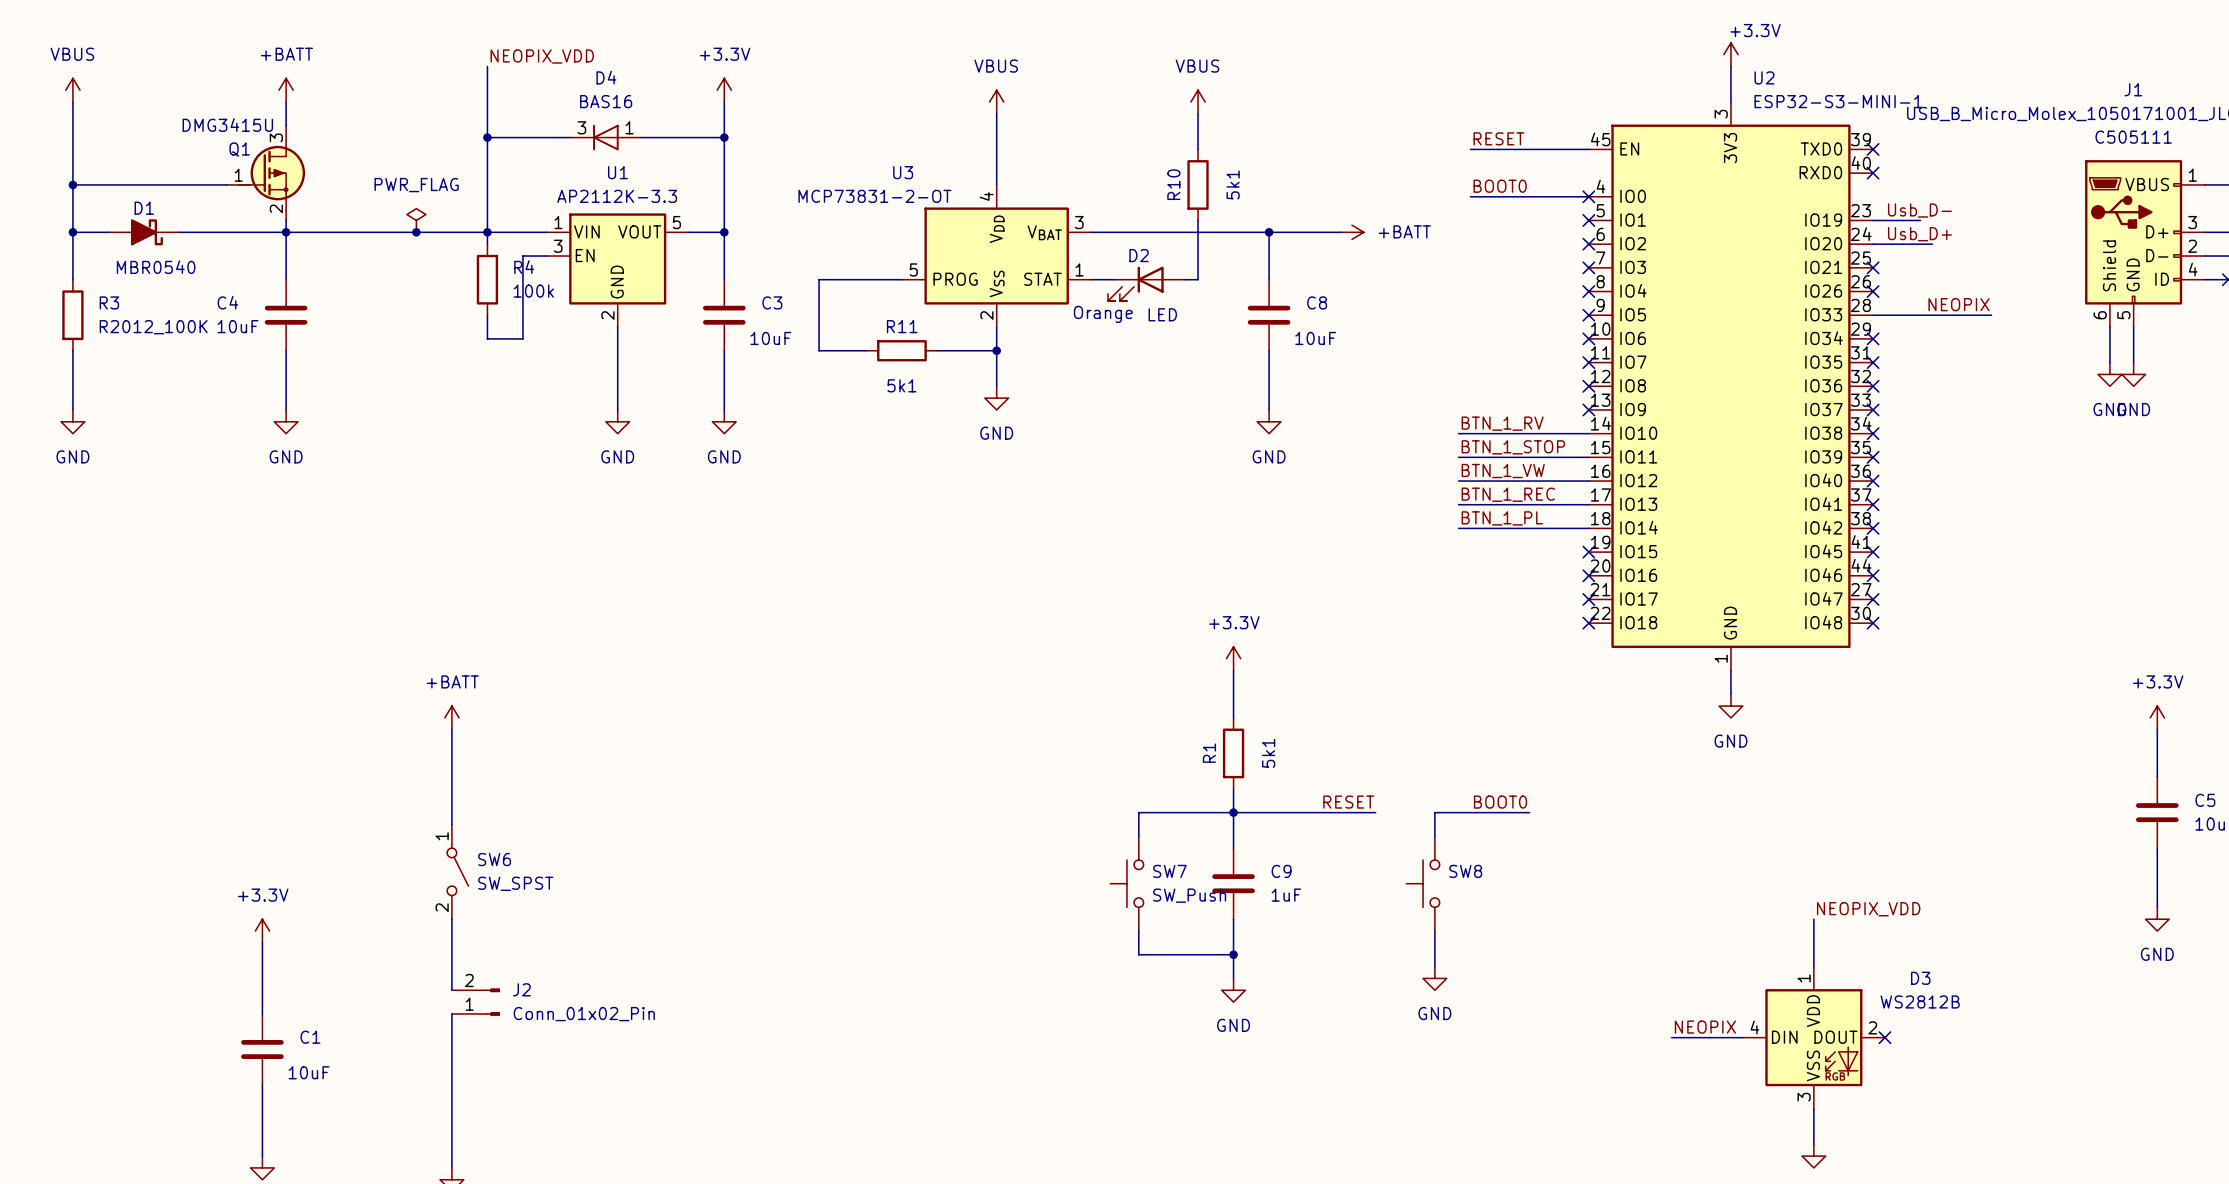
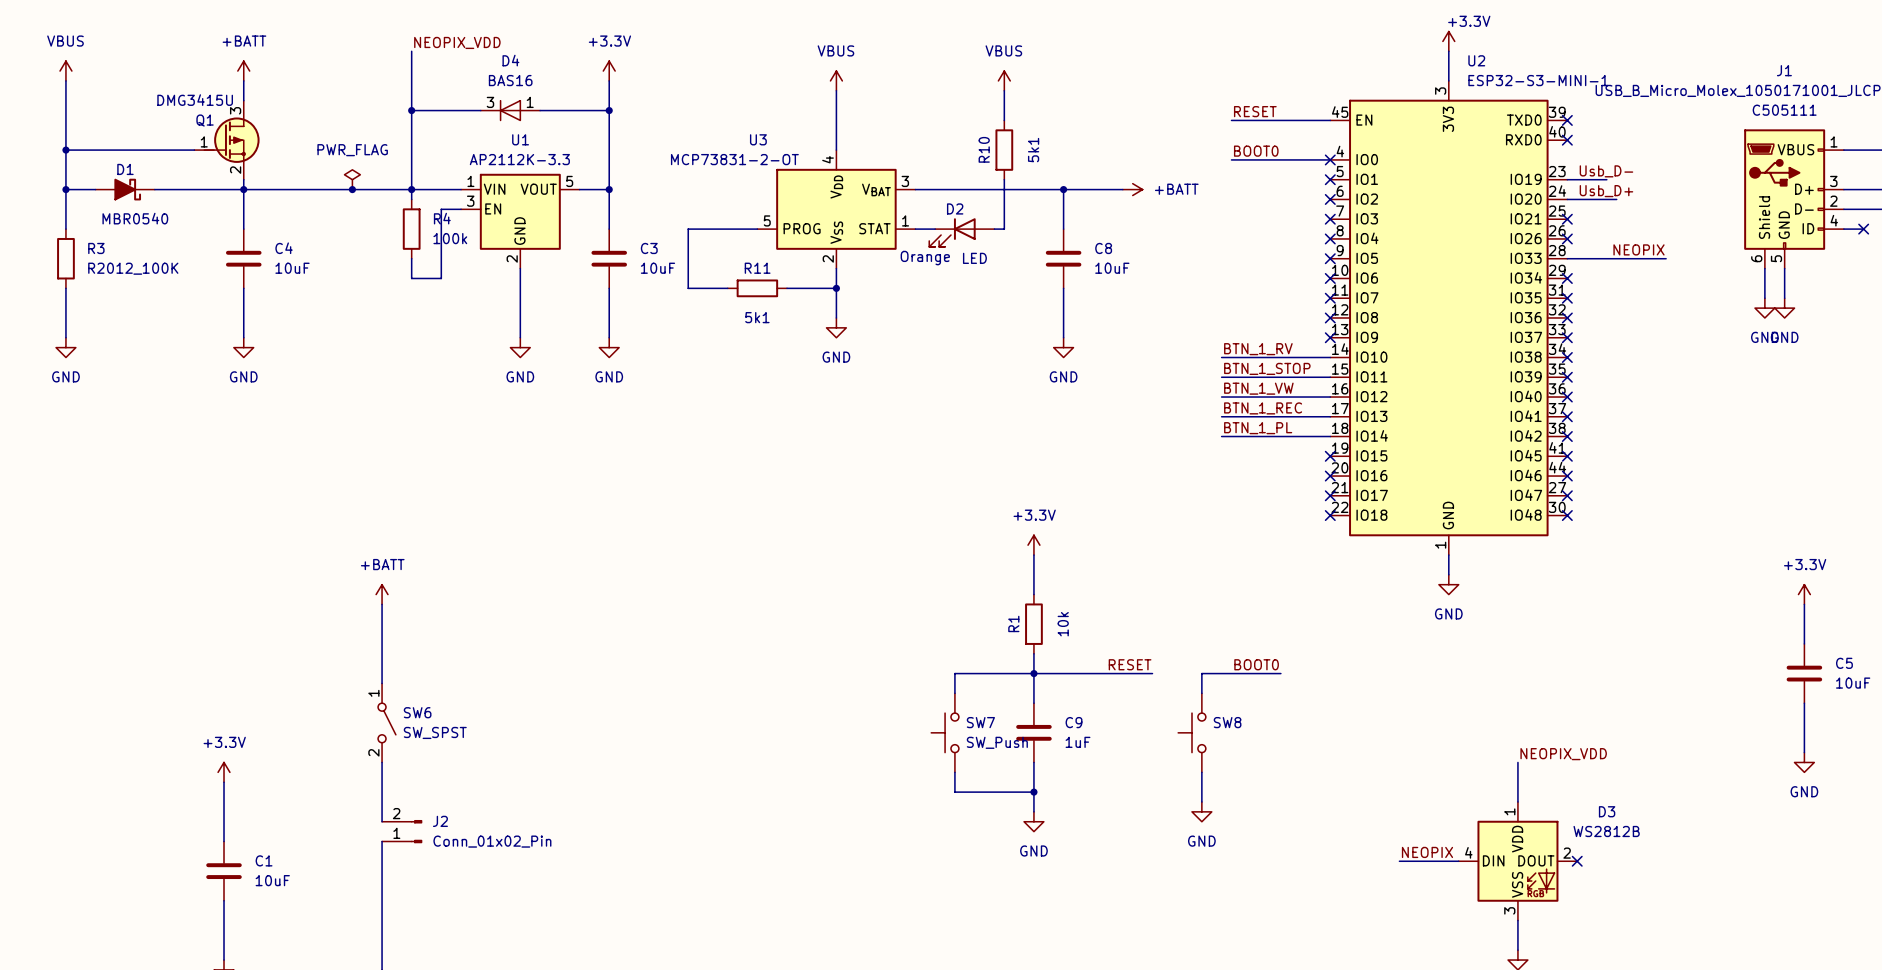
C4 name position: C4 (227, 302) -> C4 (284, 248)
C4 value position: 10uF (237, 326) -> 10uF (292, 268)
C3 value position: 10uF (770, 338) -> 10uF (657, 268)
C8 value position: 10uF (1315, 338) -> 10uF (1112, 268)
R1 value: 5k1 (1268, 753) -> 10k (1063, 624)
C1 value position: 10uF (309, 1072) -> 10uF (272, 880)

